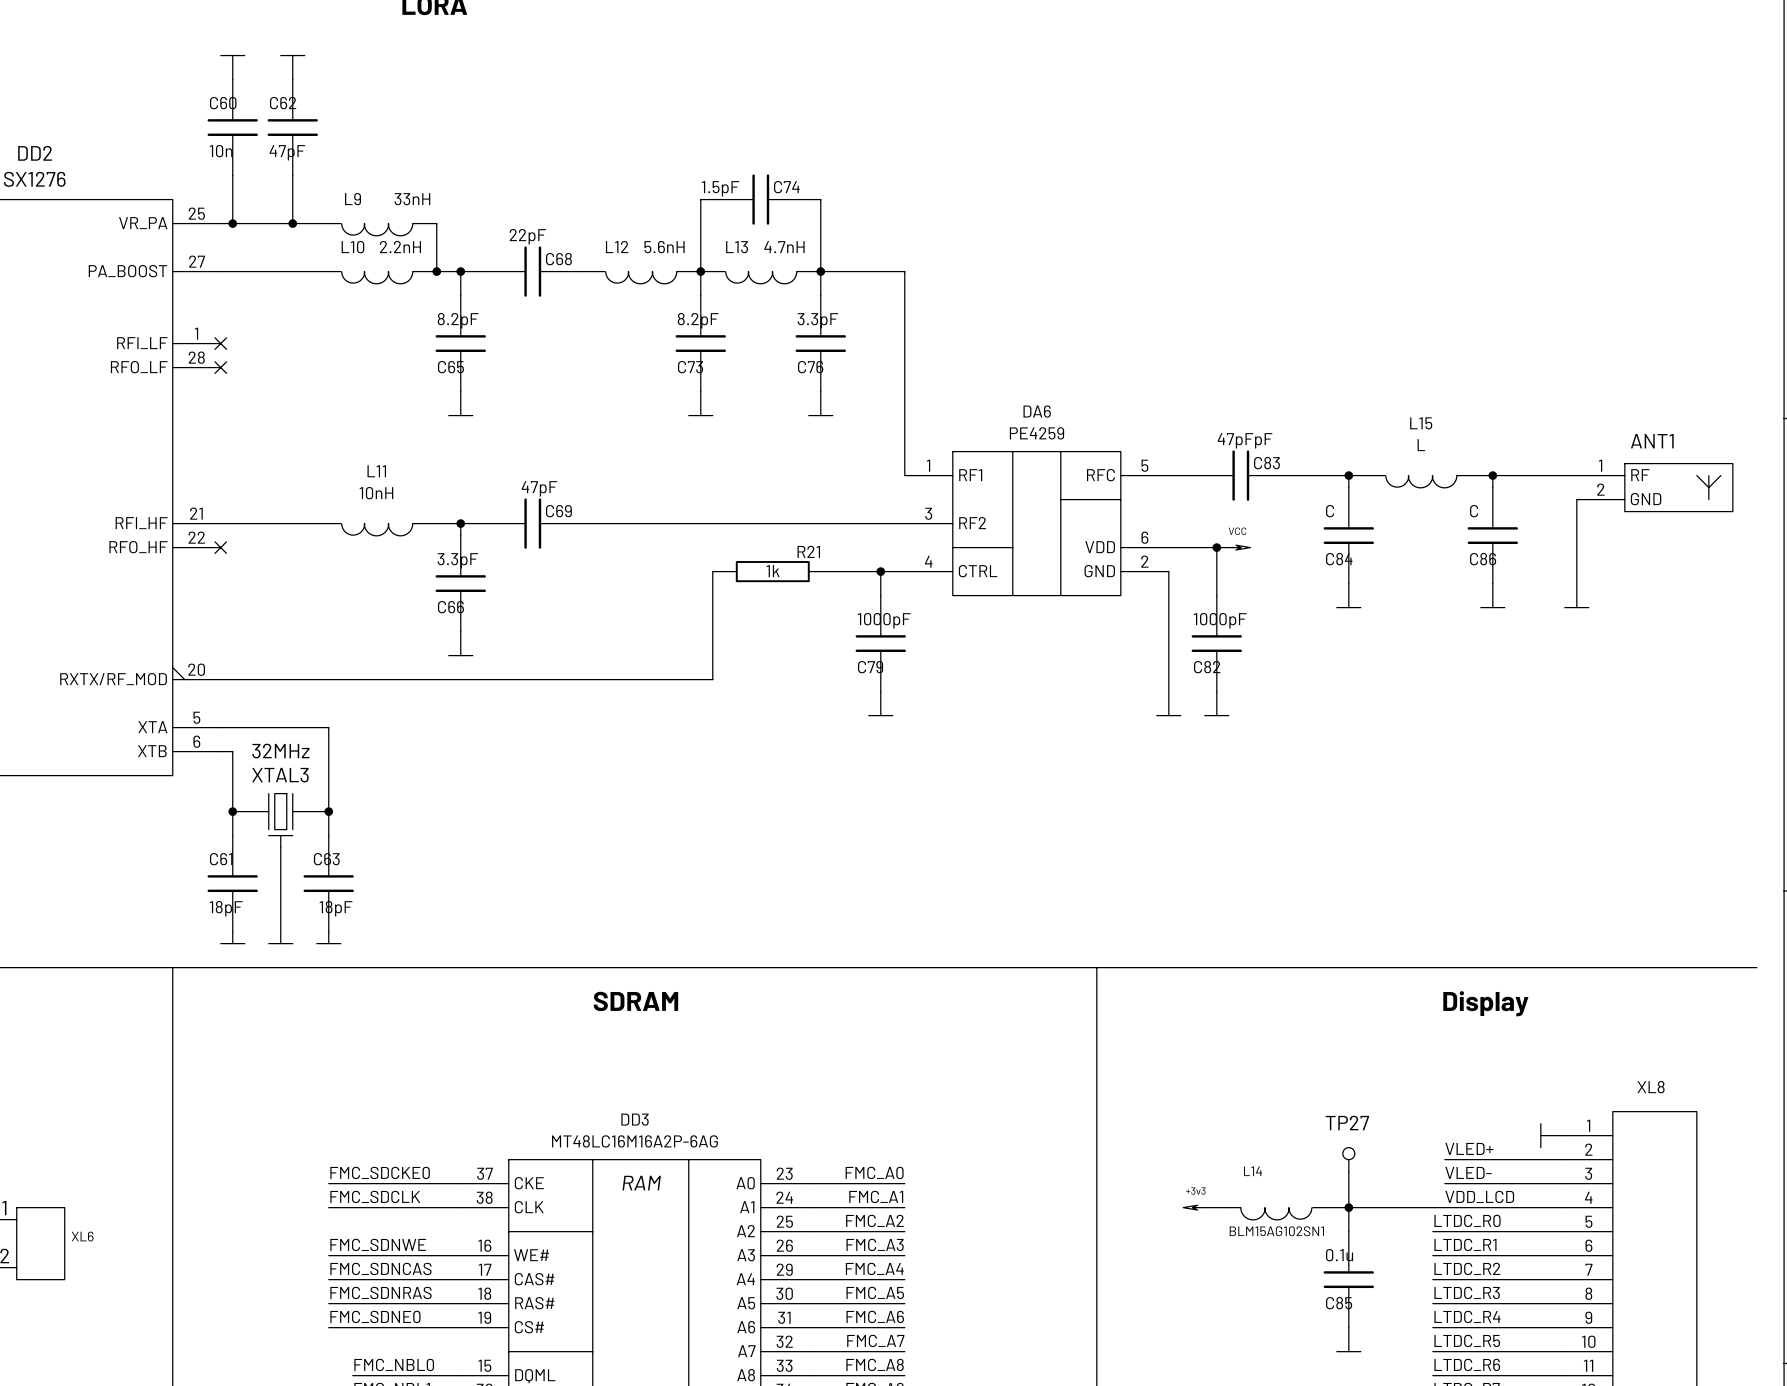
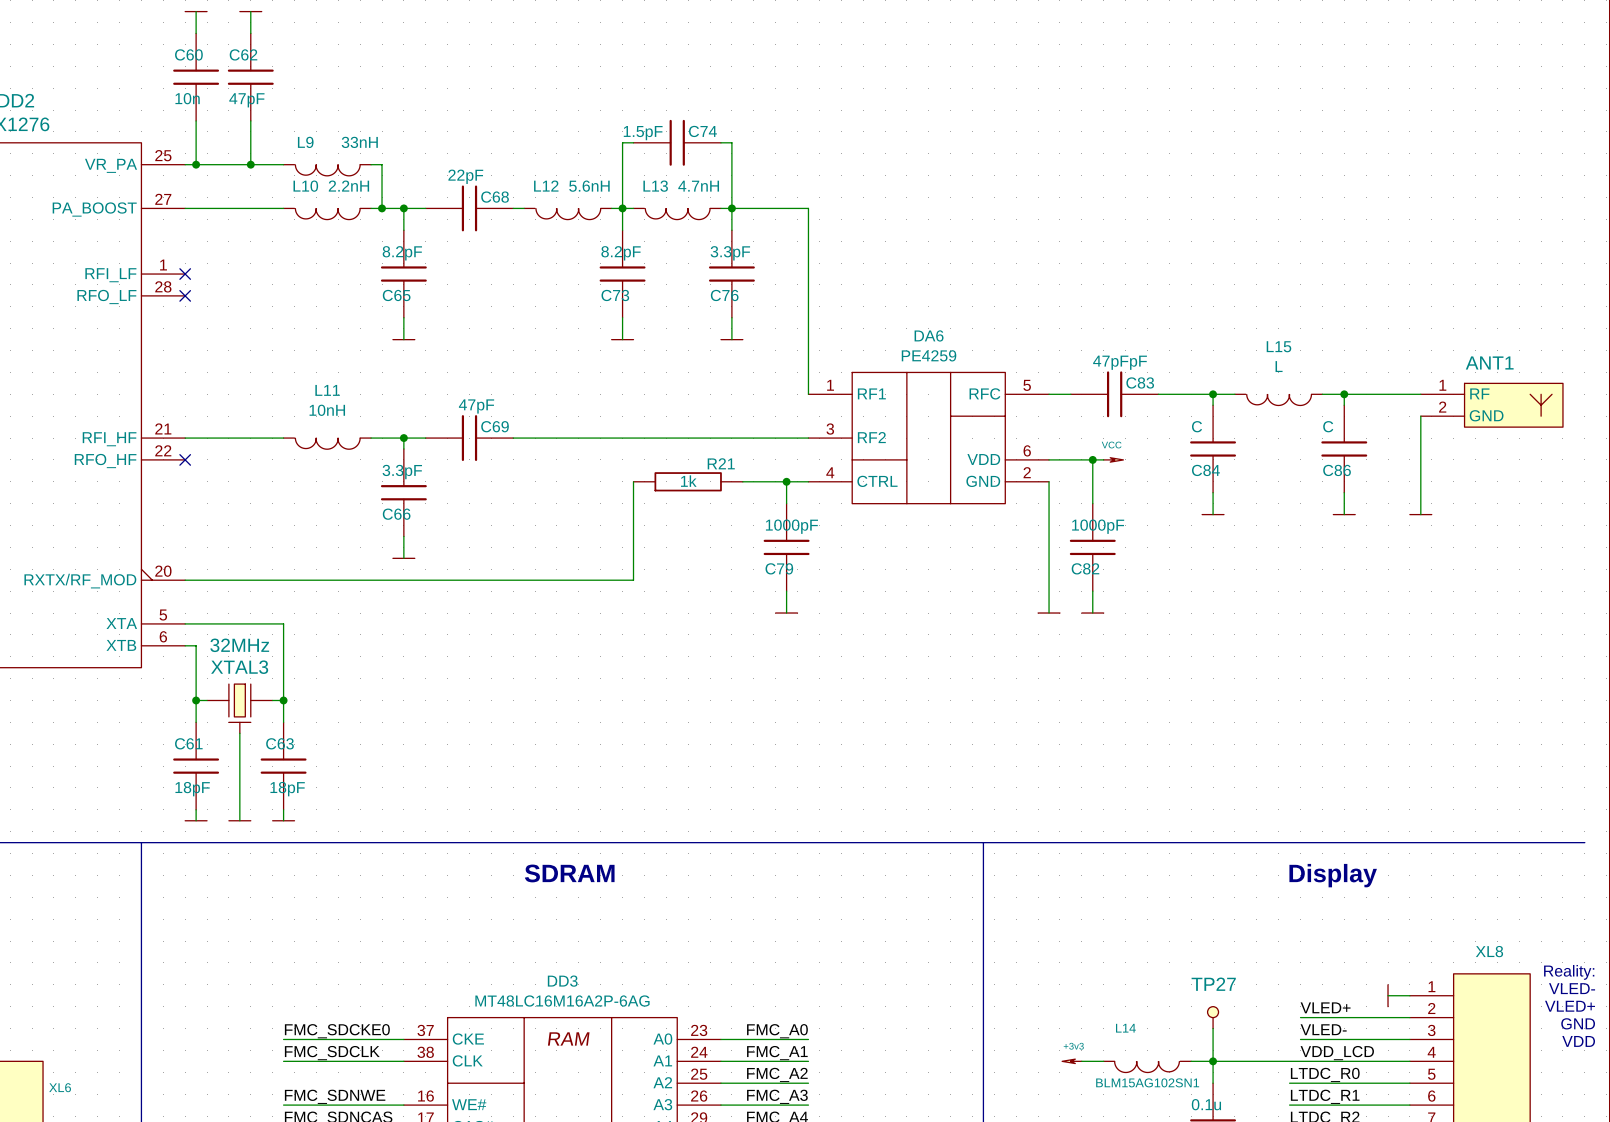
text: none -> Reality: (1569, 972)
text: none -> VLED- (1572, 988)
text: none -> VLED+ (1570, 1006)
text: none -> GND (1578, 1023)
text: none -> VDD (1578, 1041)

